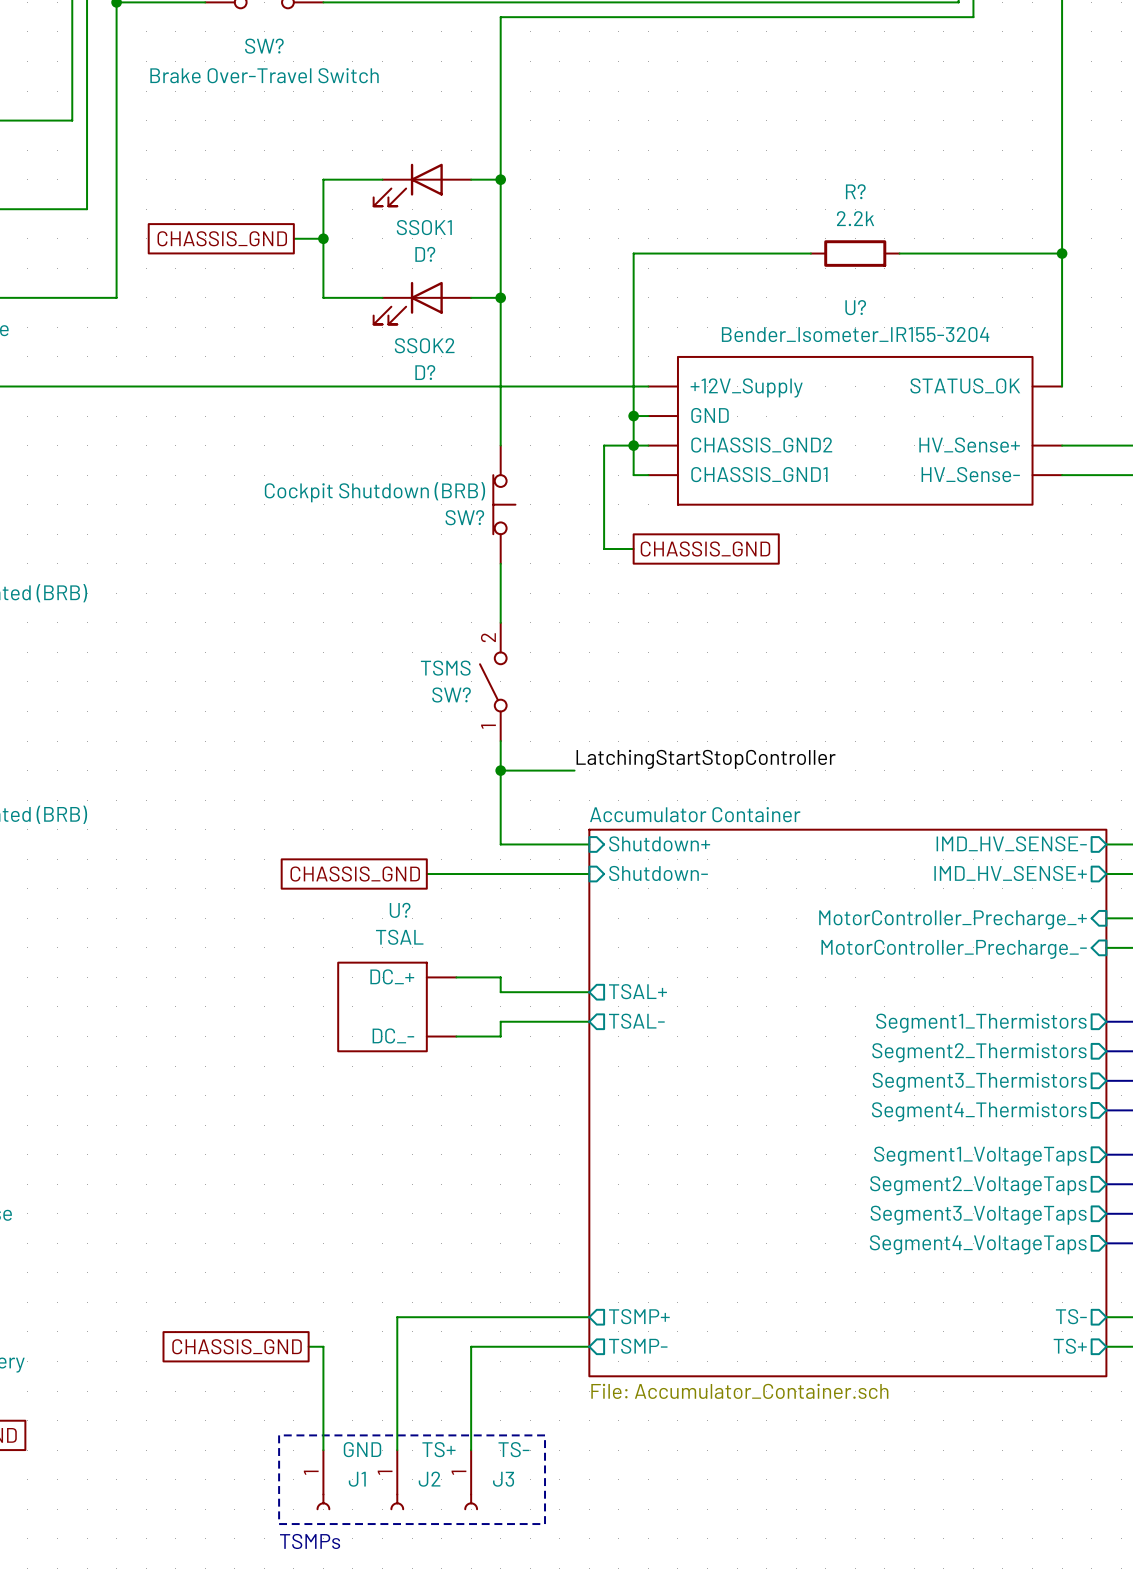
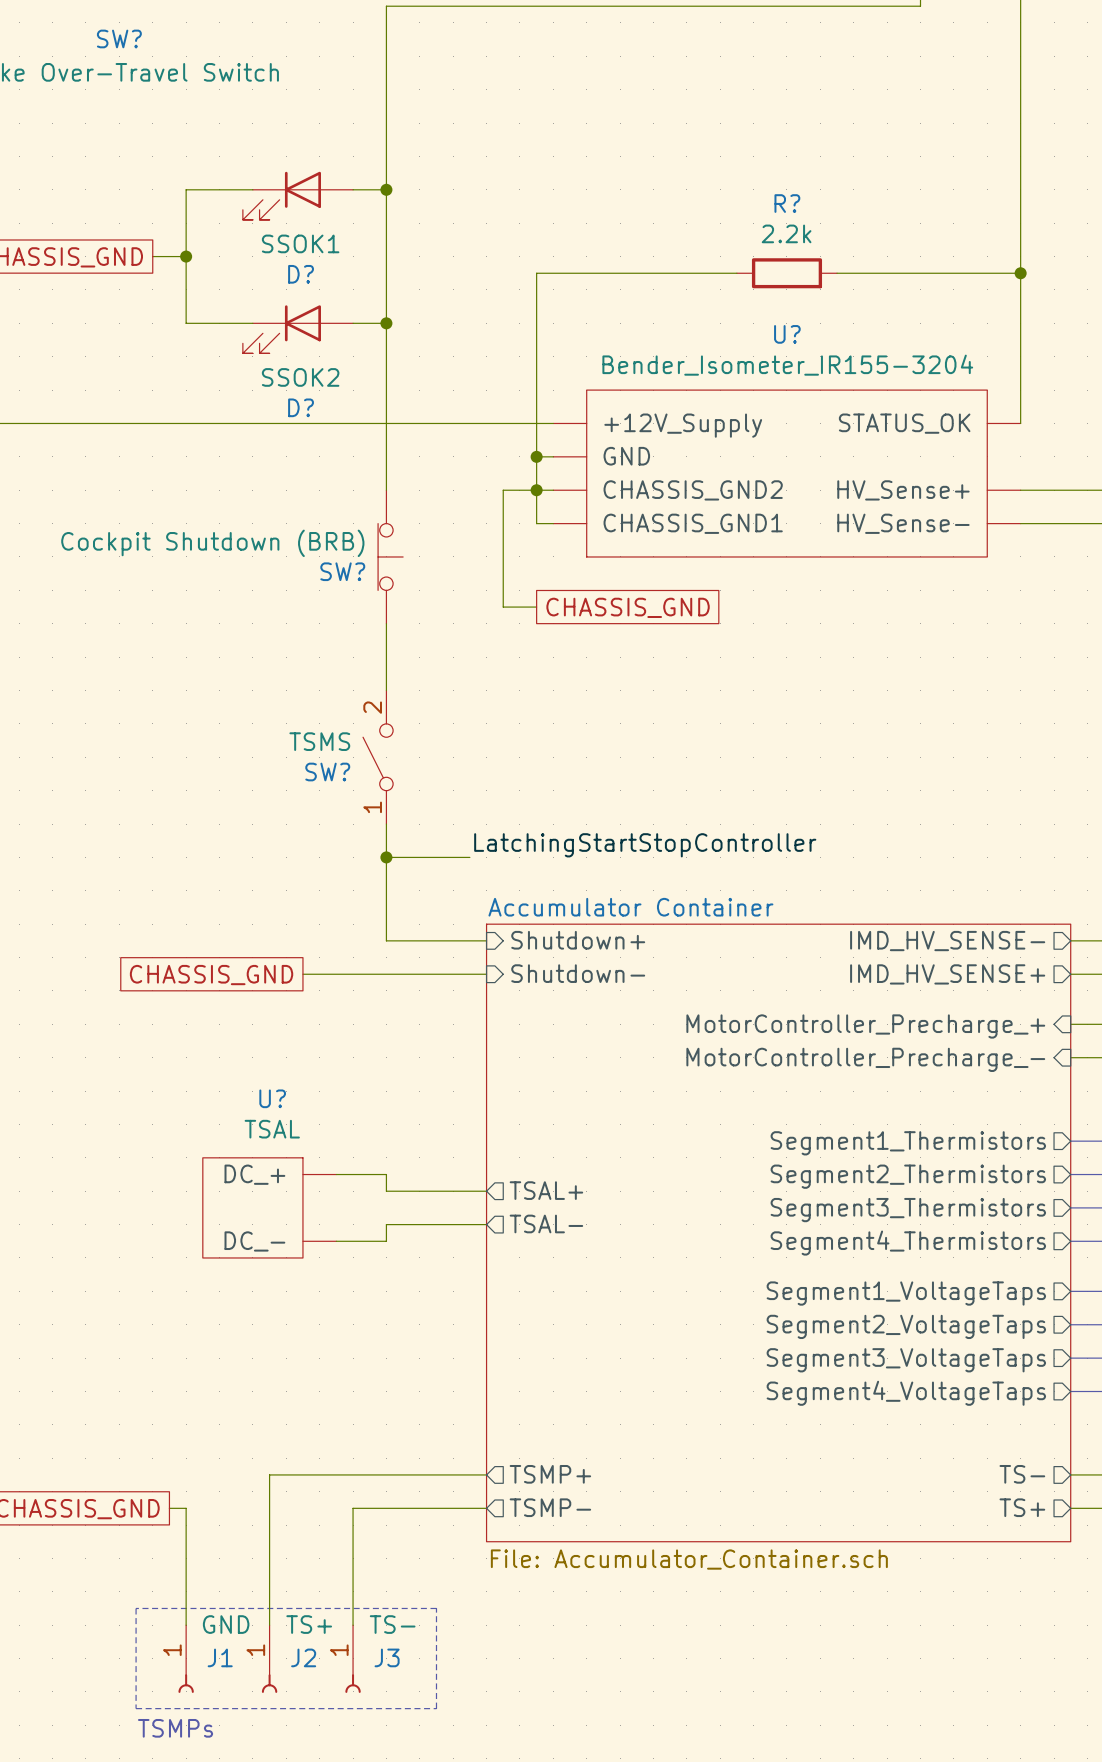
wire: (456, 977) (500, 977) (500, 992) (589, 992) -> (336, 1174) (386, 1174) (386, 1191) (486, 1191)
sheet pin position: TSAL+ (637, 991) -> TSAL+ (546, 1190)
U? position: (397, 1006) -> (269, 1207)
wire: (589, 1021) (500, 1021) (500, 1036) (456, 1036) -> (486, 1224) (386, 1224) (386, 1241) (336, 1241)
sheet pin position: TSAL- (636, 1021) -> TSAL- (546, 1223)

